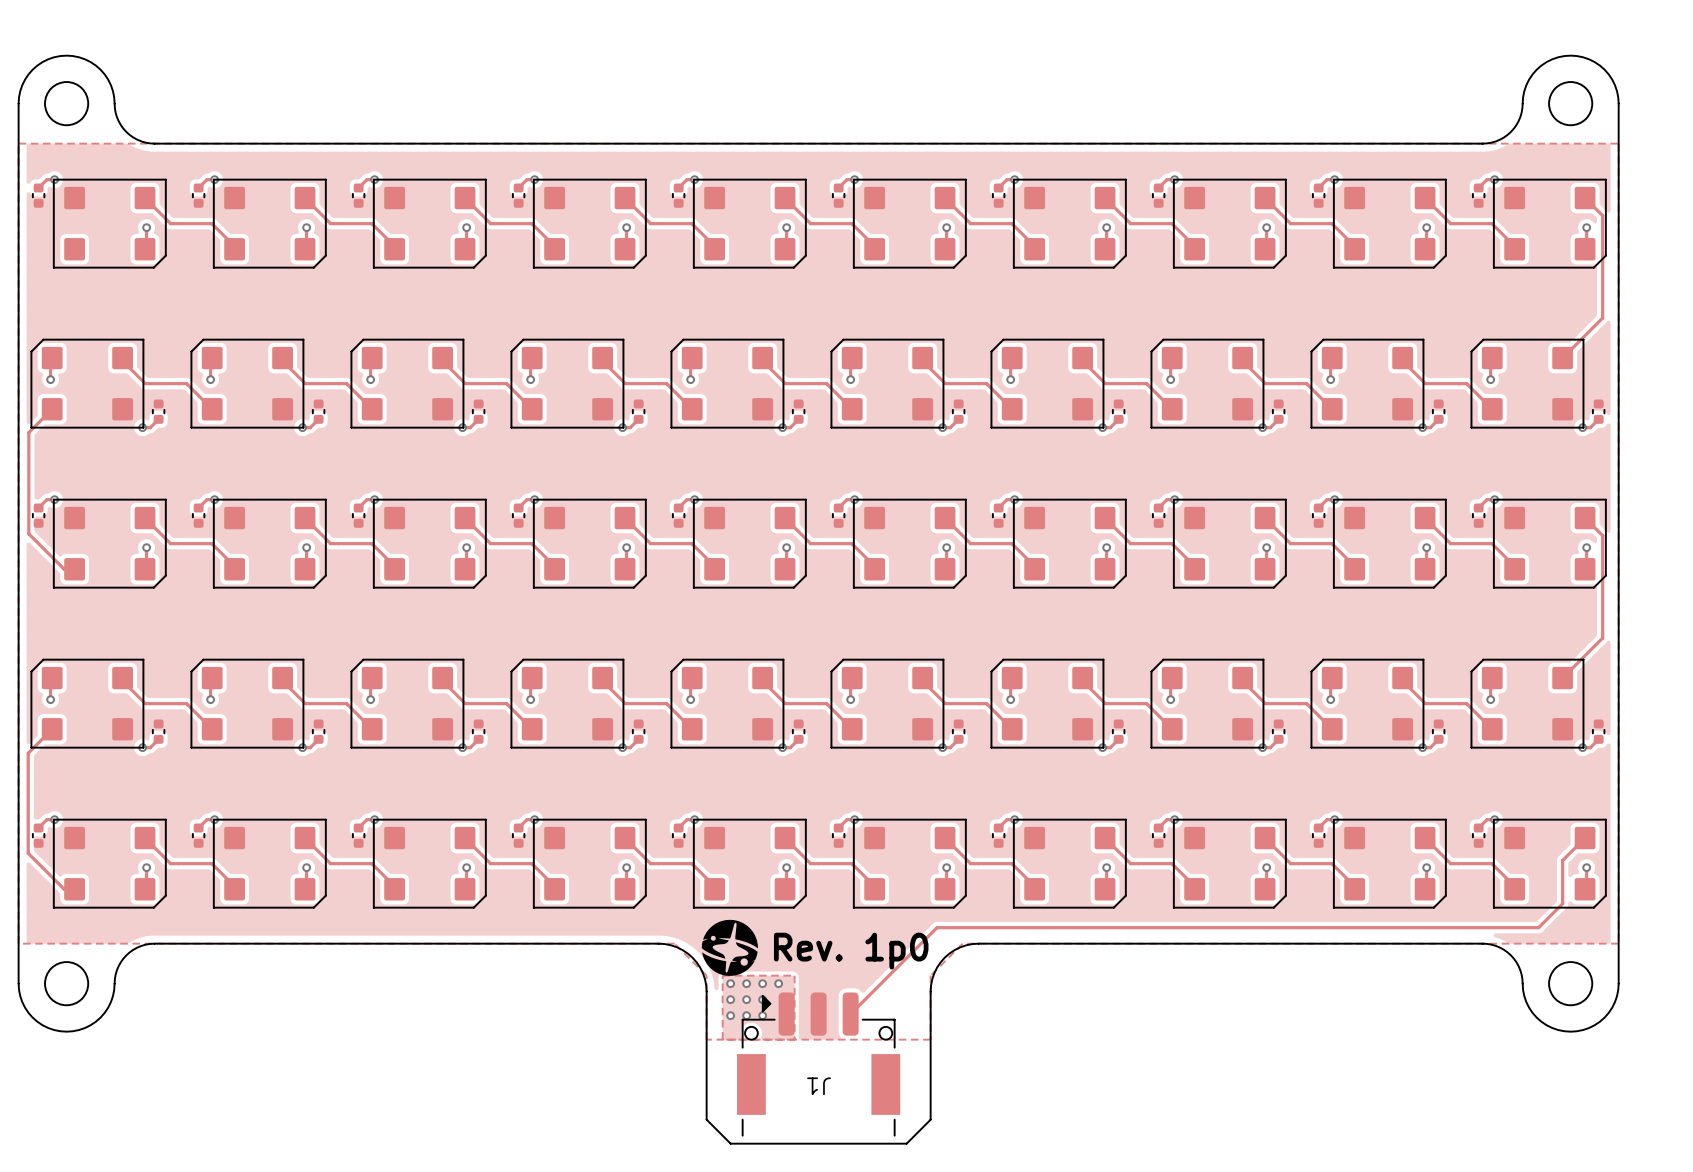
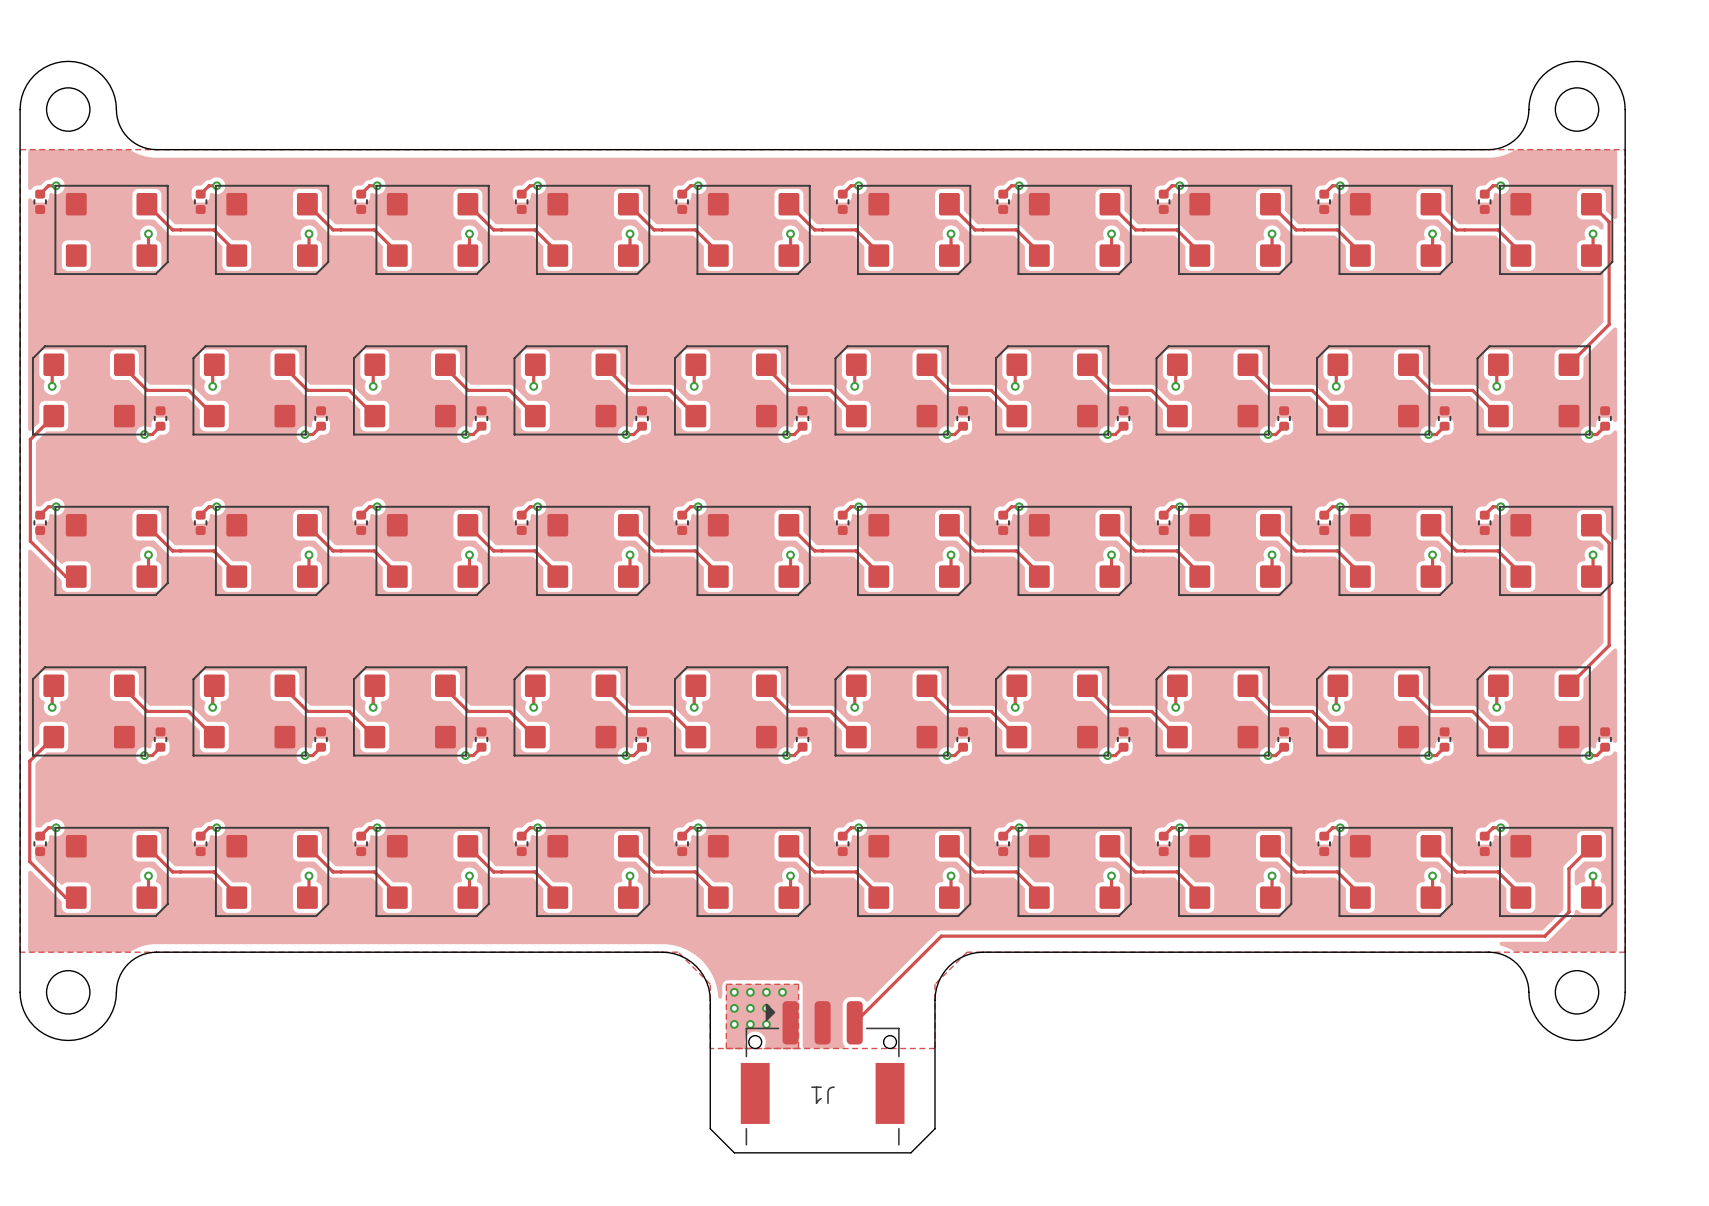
drawing: [701, 919, 758, 976] -> none
text: Rev. 1p0 (851, 951) -> none

